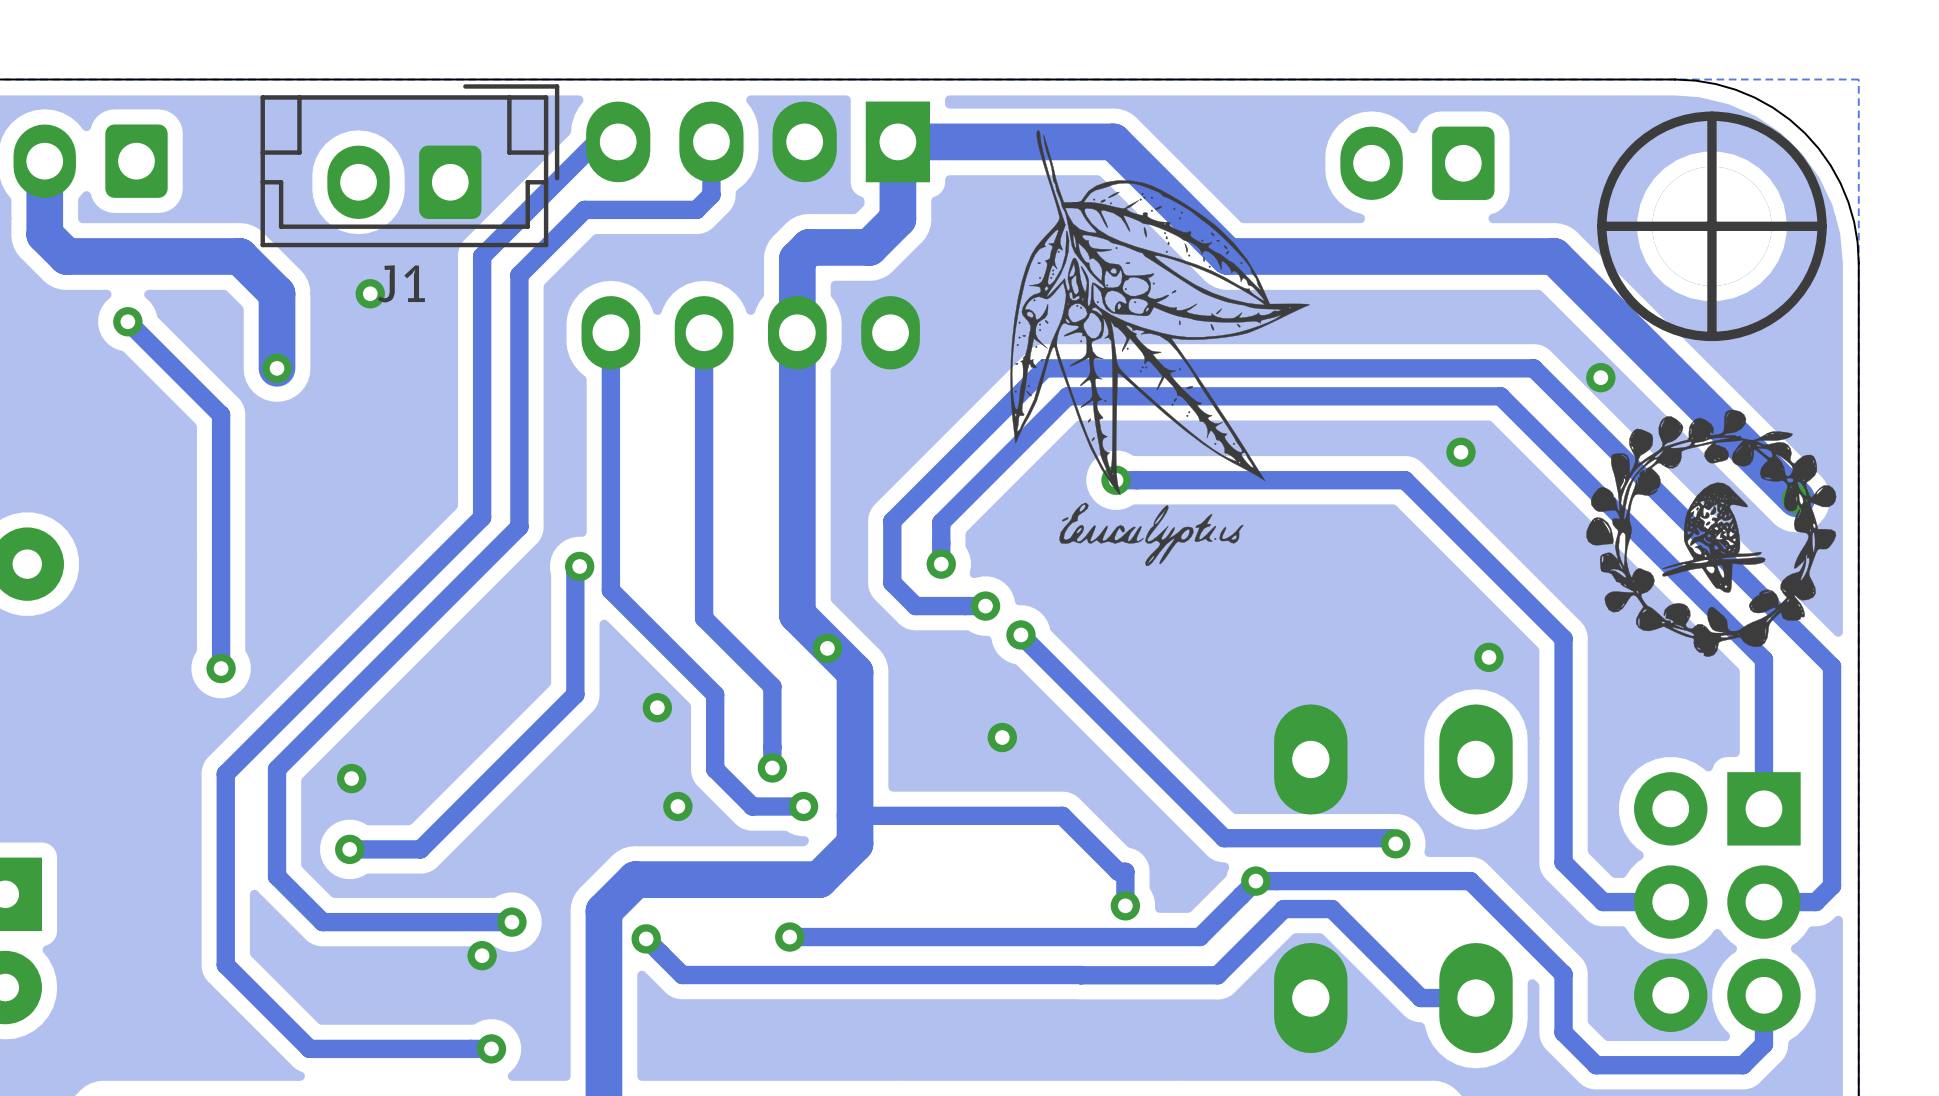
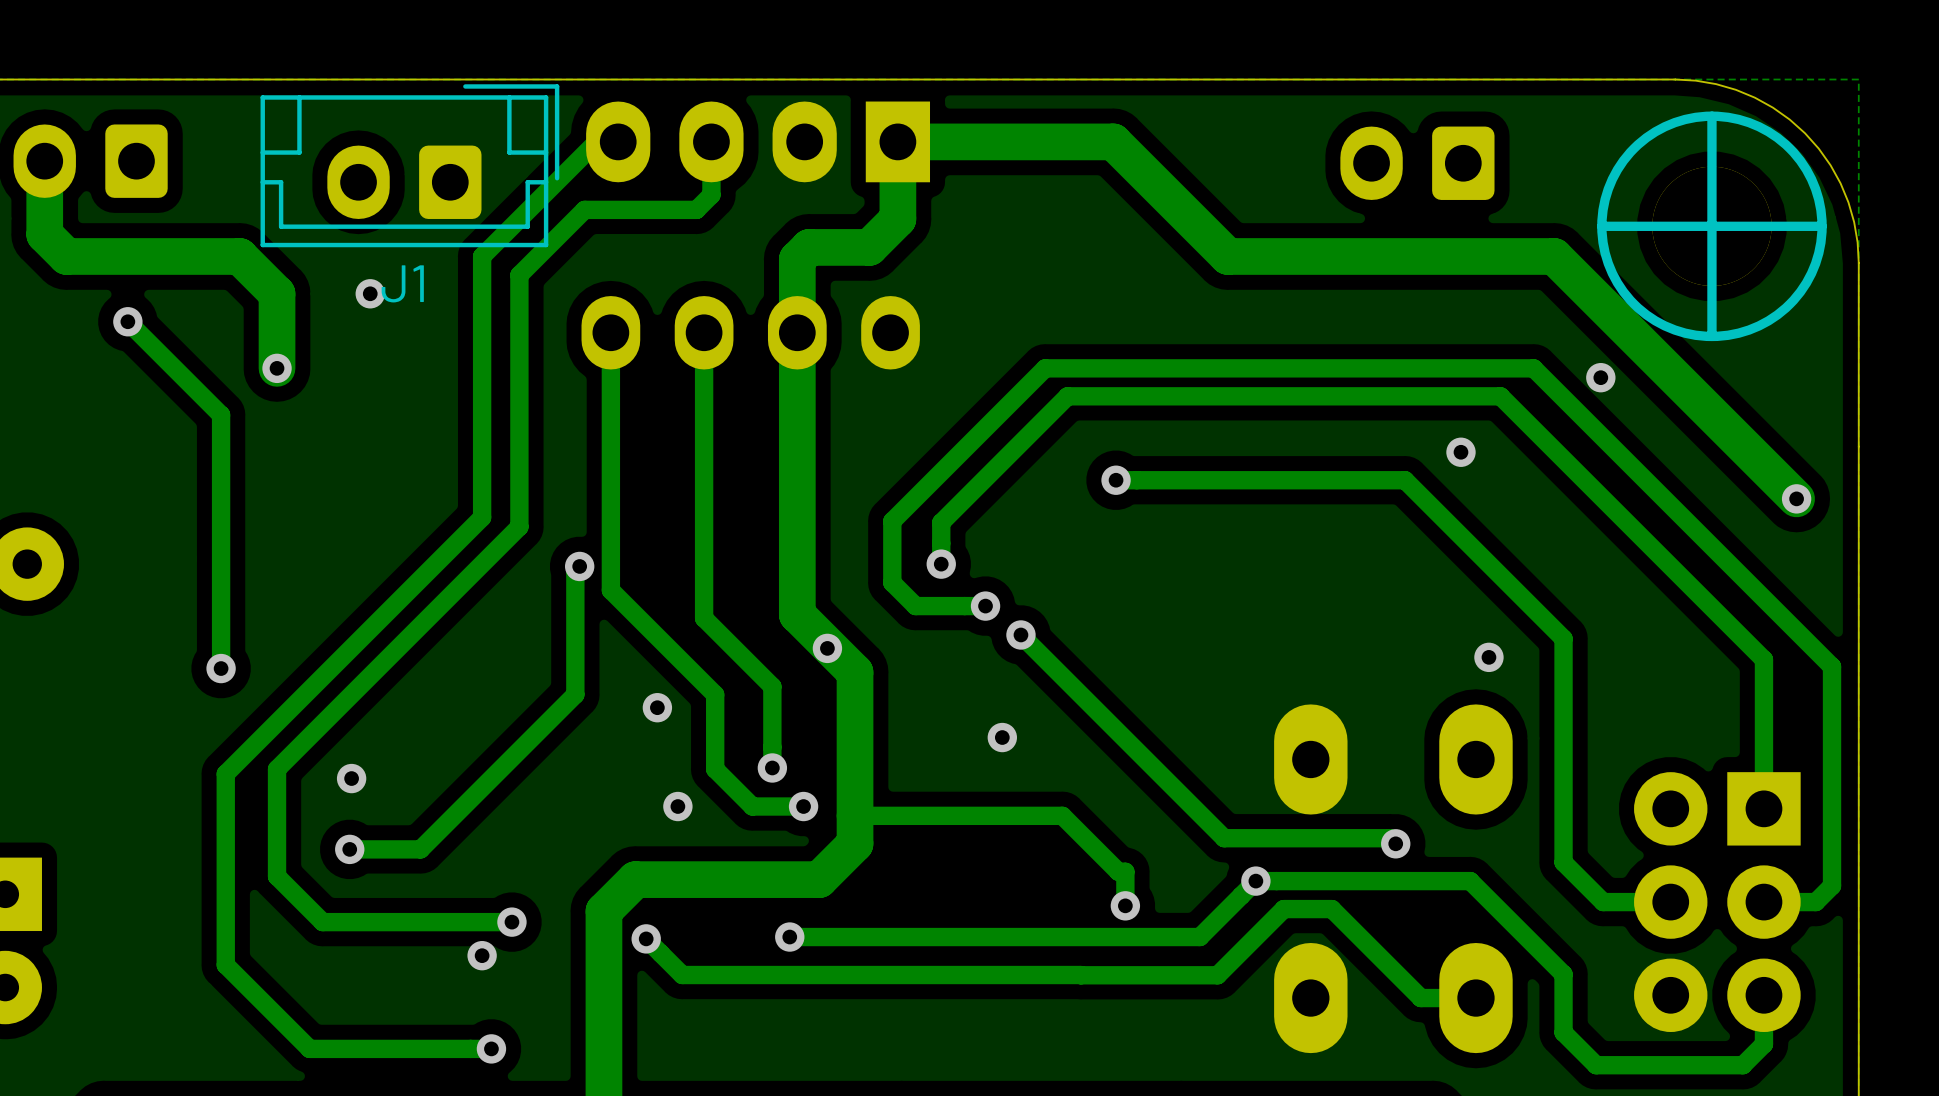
drawing: [1010, 130, 1310, 566] -> none
drawing: [1586, 409, 1837, 657] -> none

